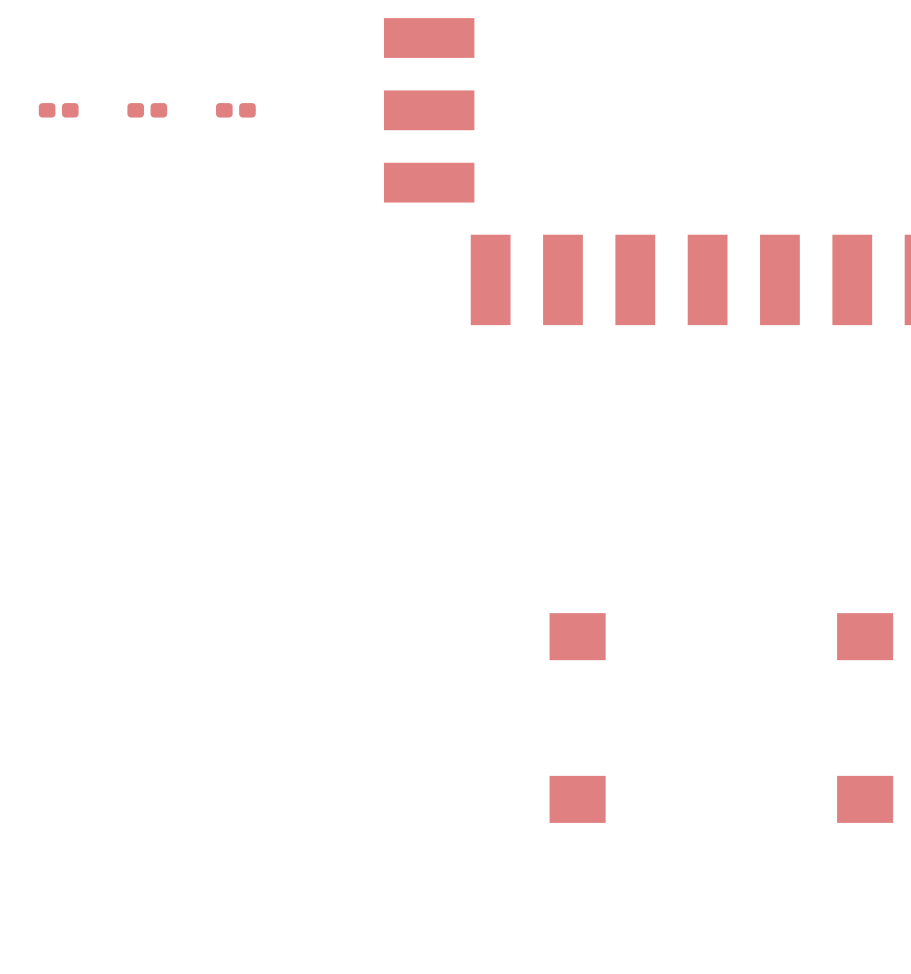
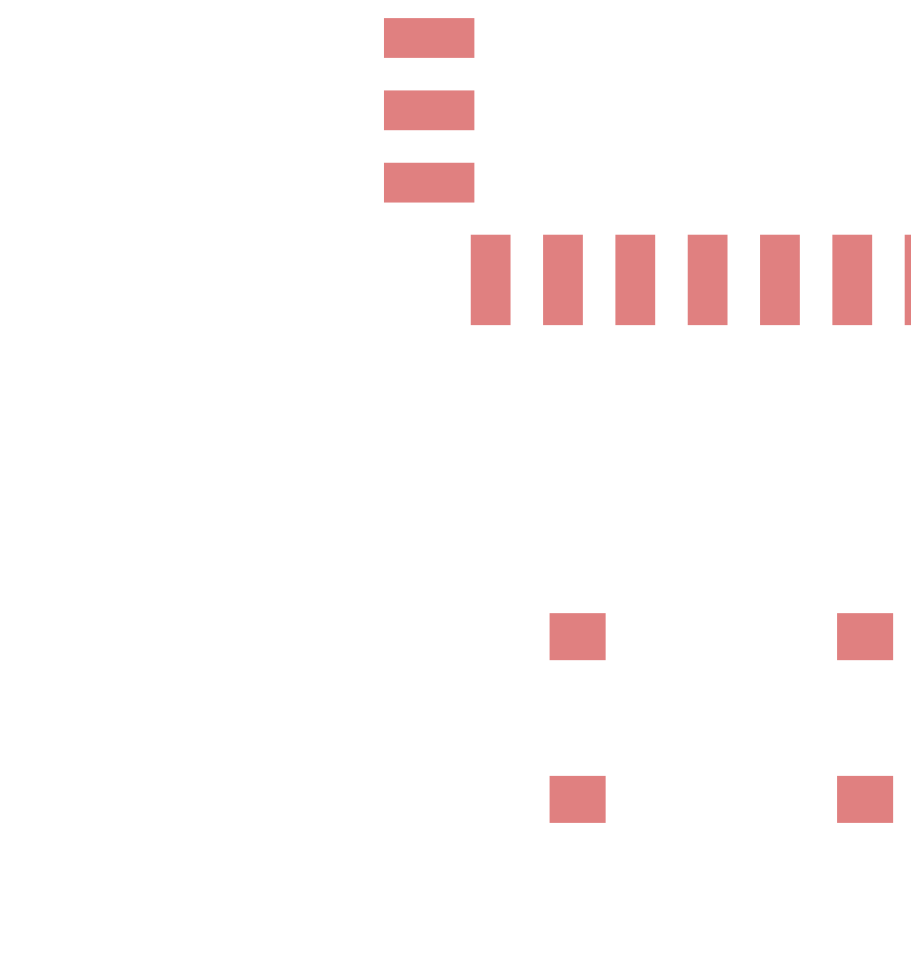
part: (58, 110) -> none
part: (147, 110) -> none
part: (235, 110) -> none

